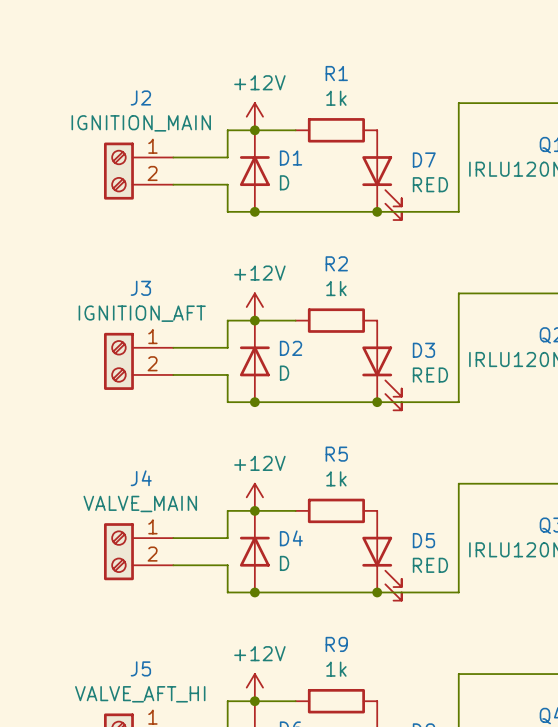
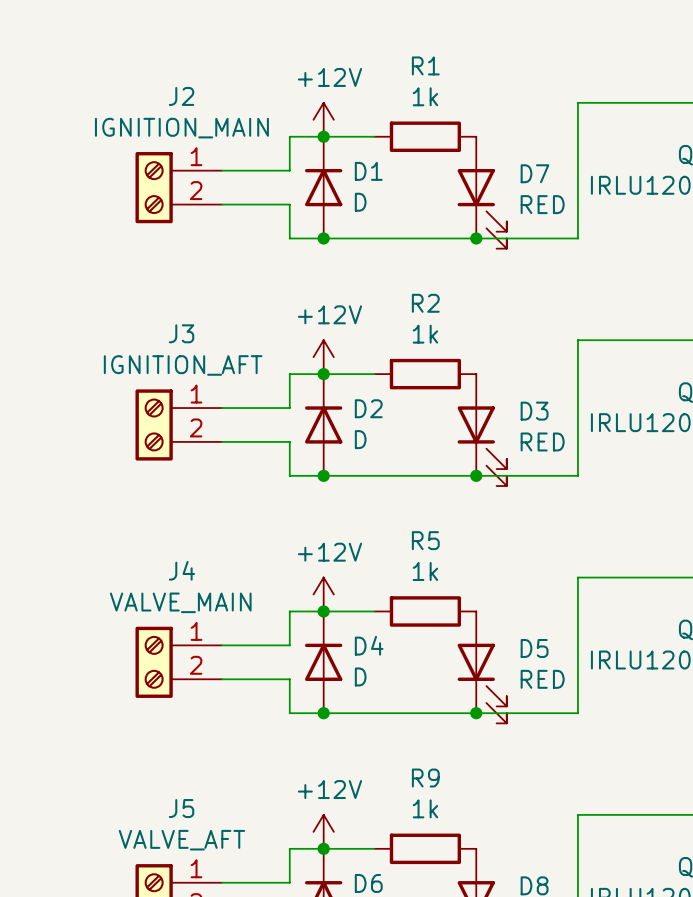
J5 value: VALVE_AFT_HI (140, 694) -> VALVE_AFT (181, 840)

